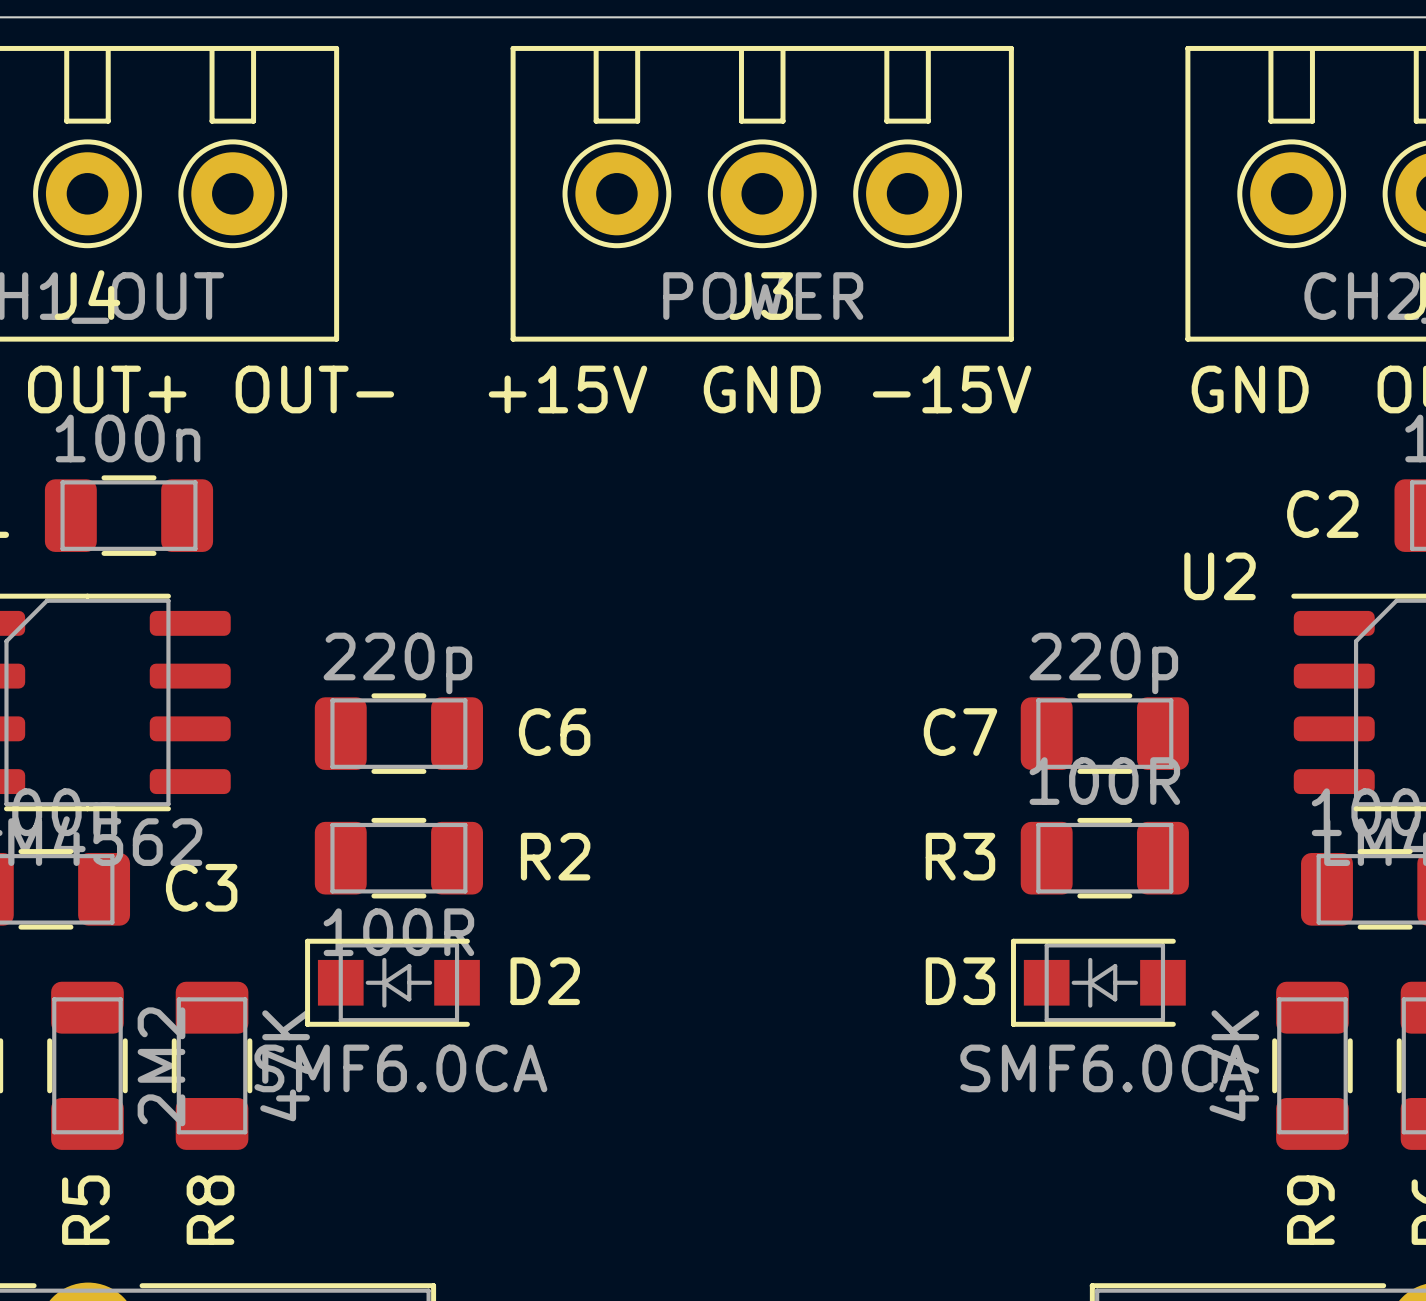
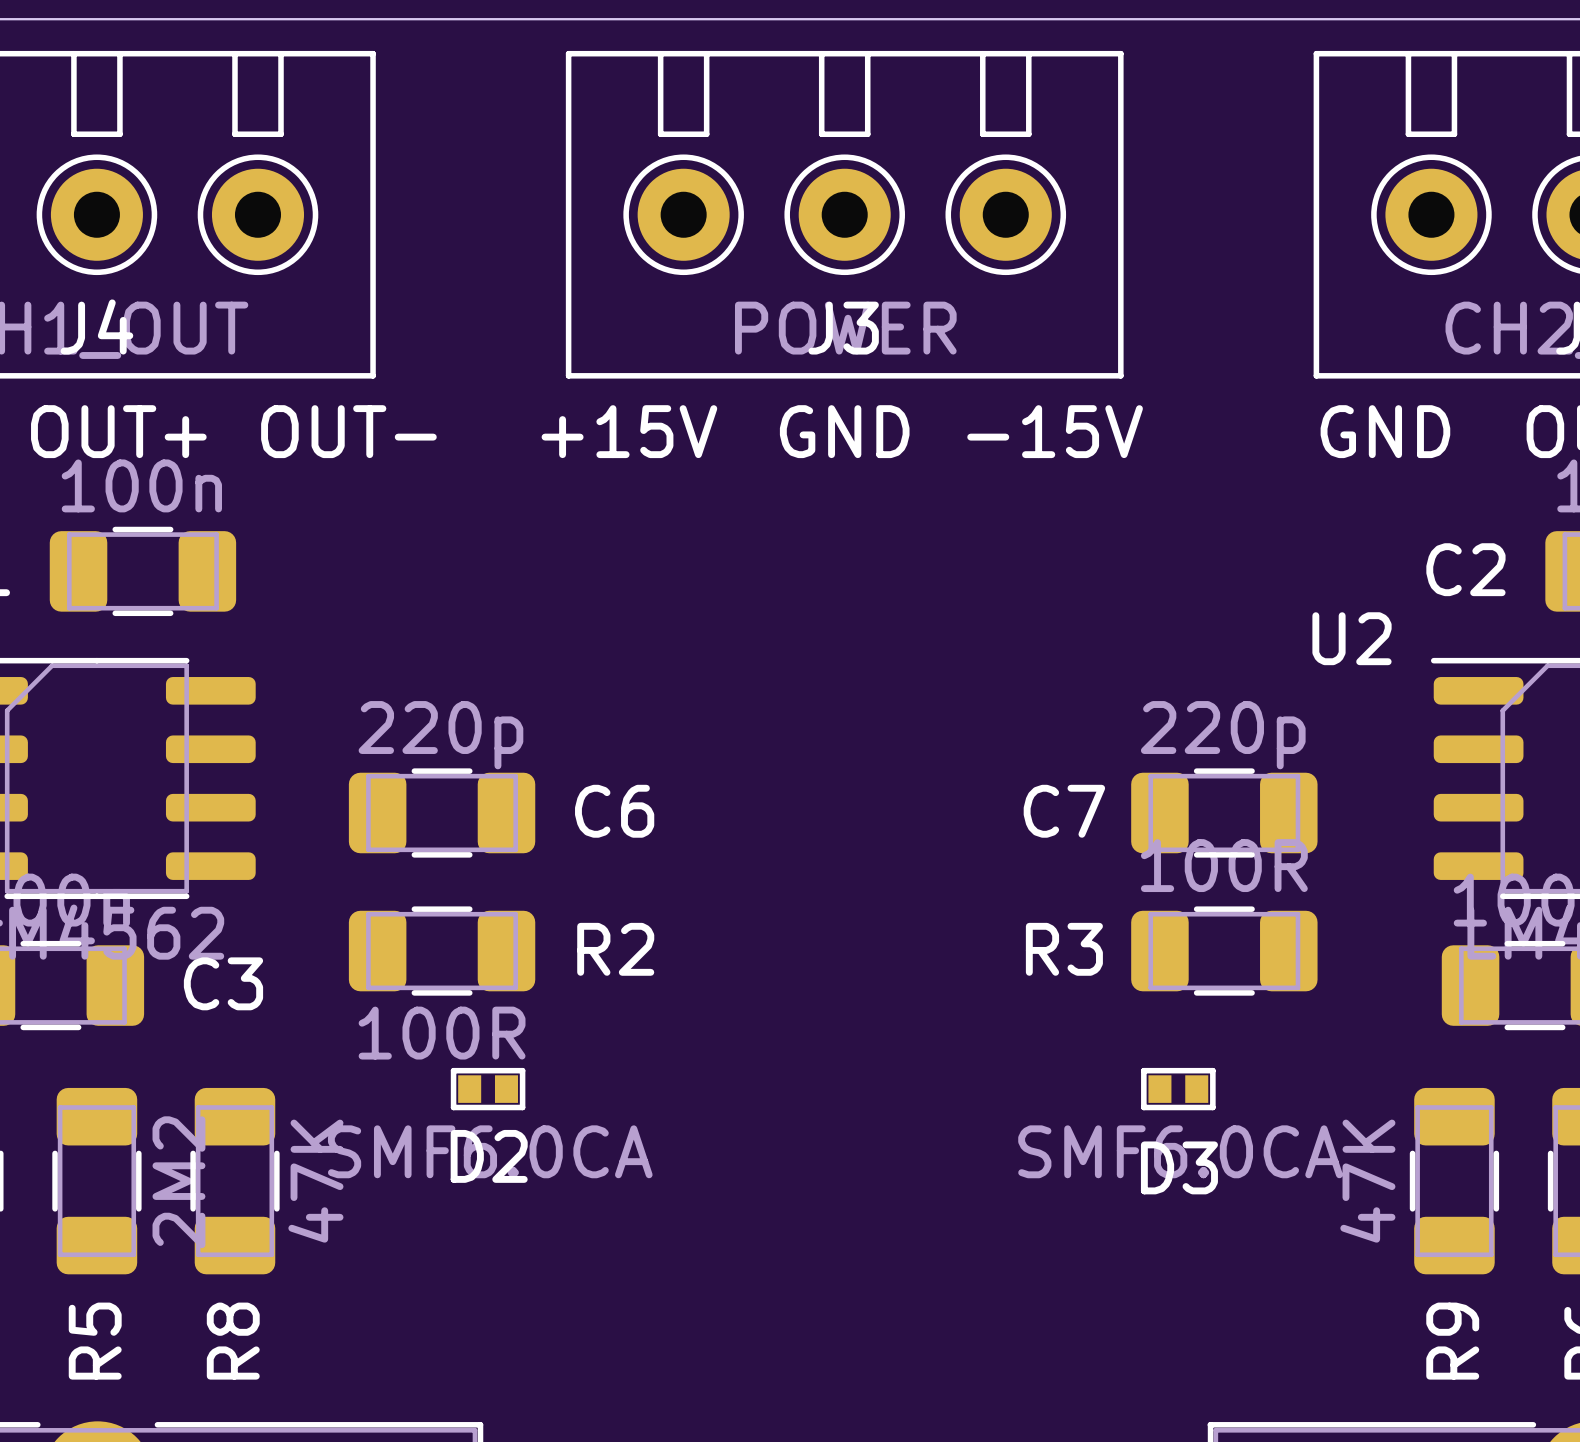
D2 footprint: [305, 938, 480, 1027] -> [450, 1067, 526, 1111]
D3 footprint: [1010, 938, 1186, 1027] -> [1141, 1067, 1216, 1111]
D2 name position: D2 (545, 981) -> D2 (489, 1156)
D3 name position: D3 (960, 981) -> D3 (1179, 1167)

